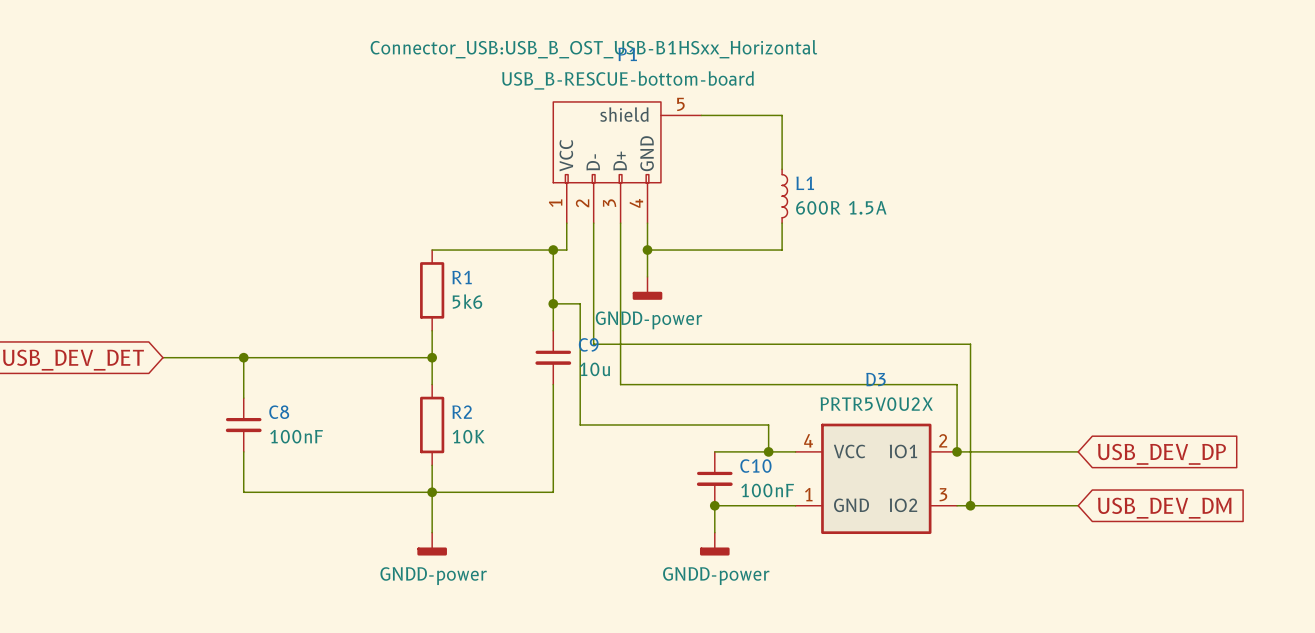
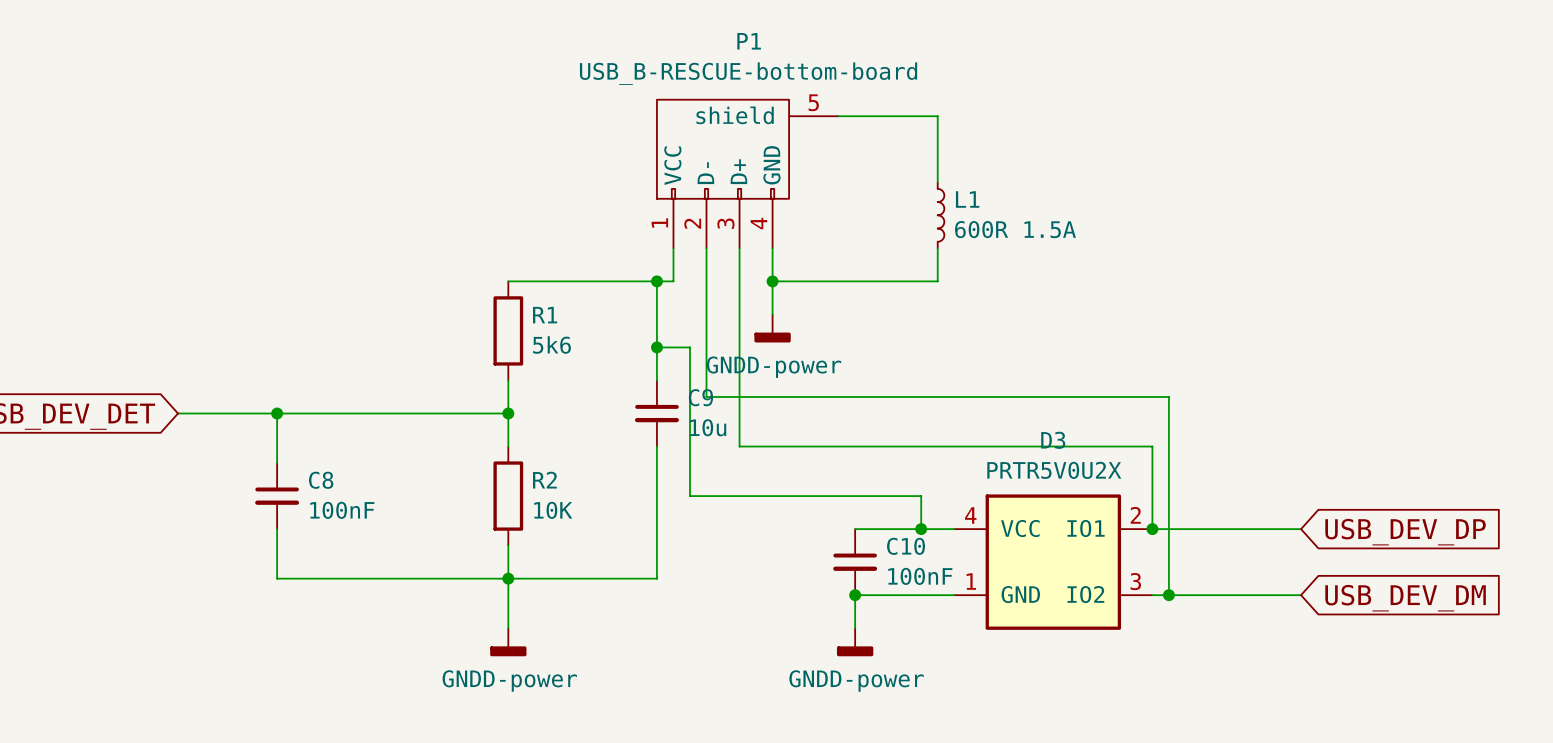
P1 text: Connector_USB:USB_B_OST_USB-B1HSxx_Horizontal (593, 49) -> none

